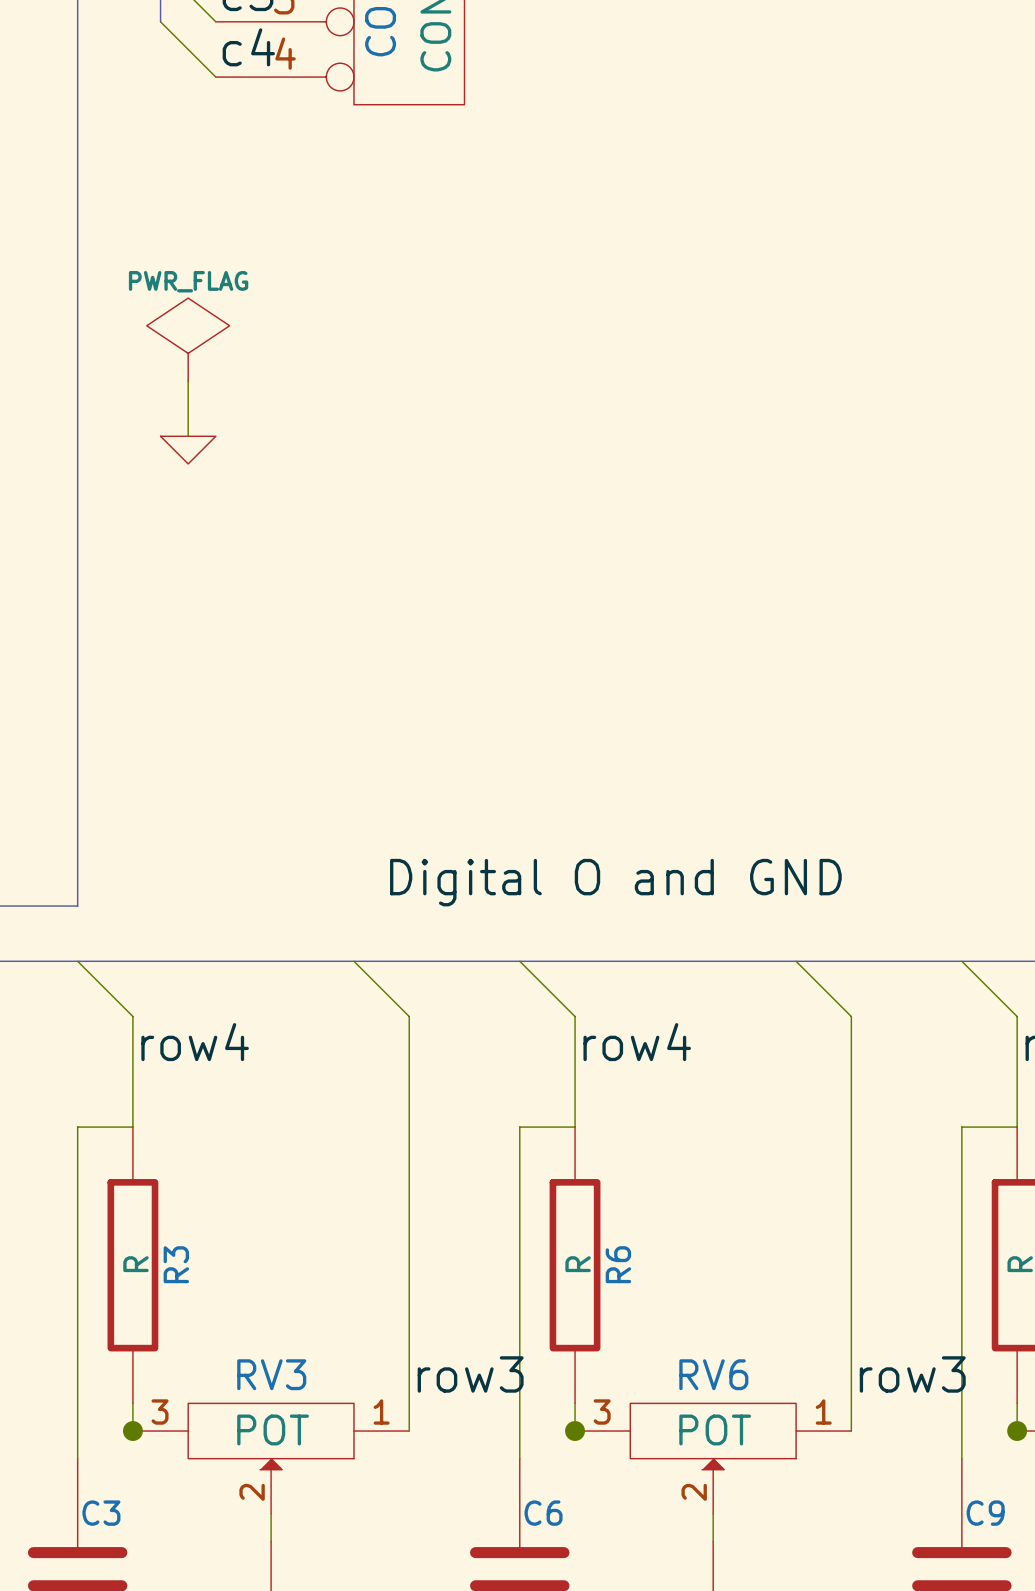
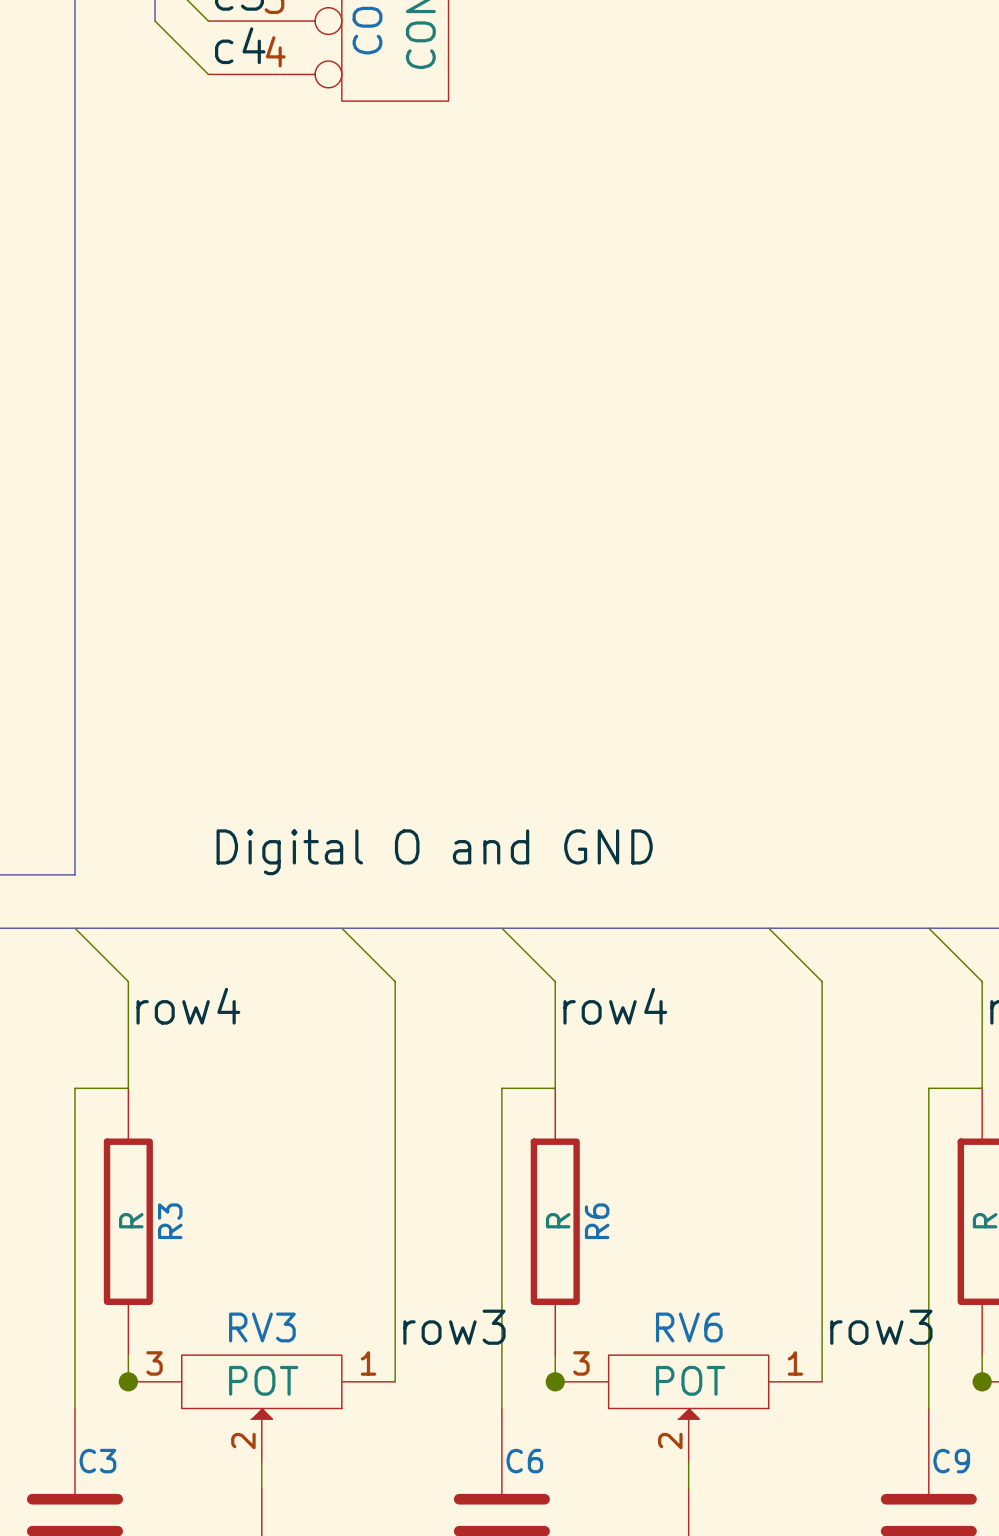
power symbol: PWR_FLAG (188, 339) -> none
wire: (188, 381) (188, 436) -> none
power symbol: (188, 450) -> none
label position: Digital O and GND (615, 882) -> Digital O and GND (434, 852)

